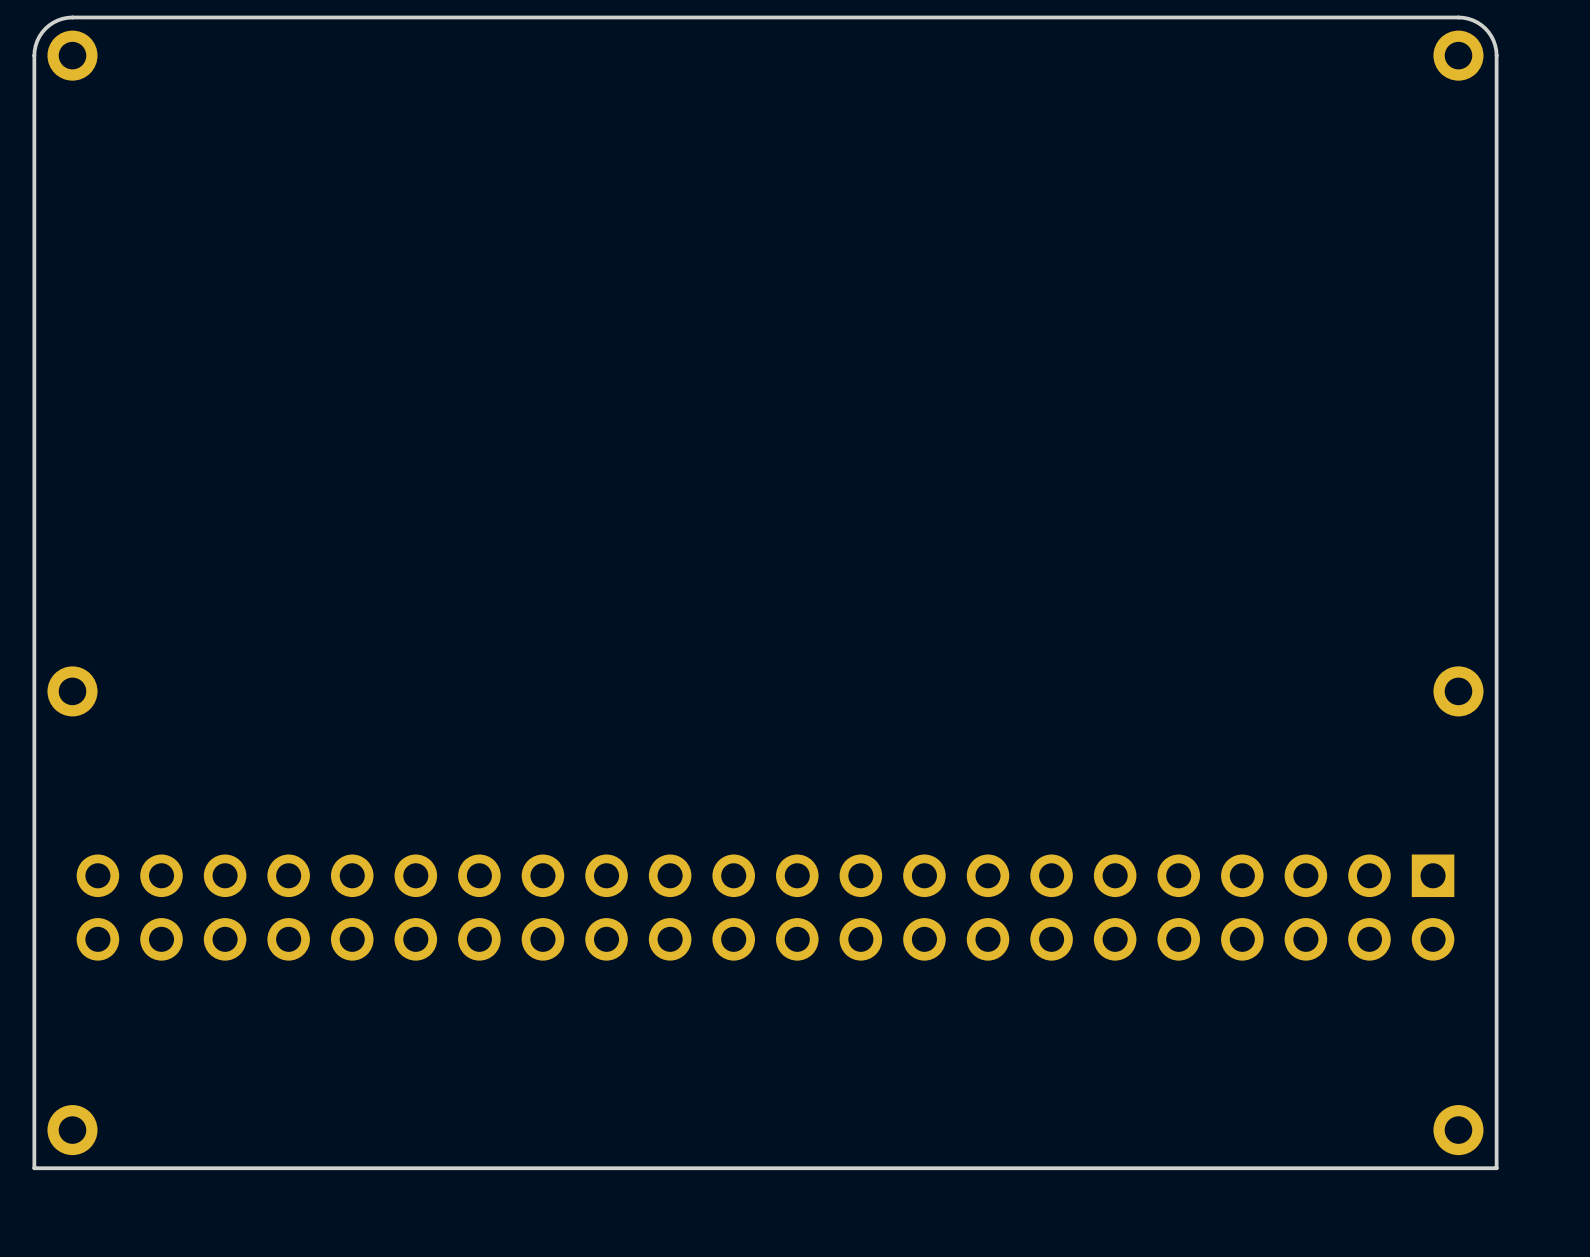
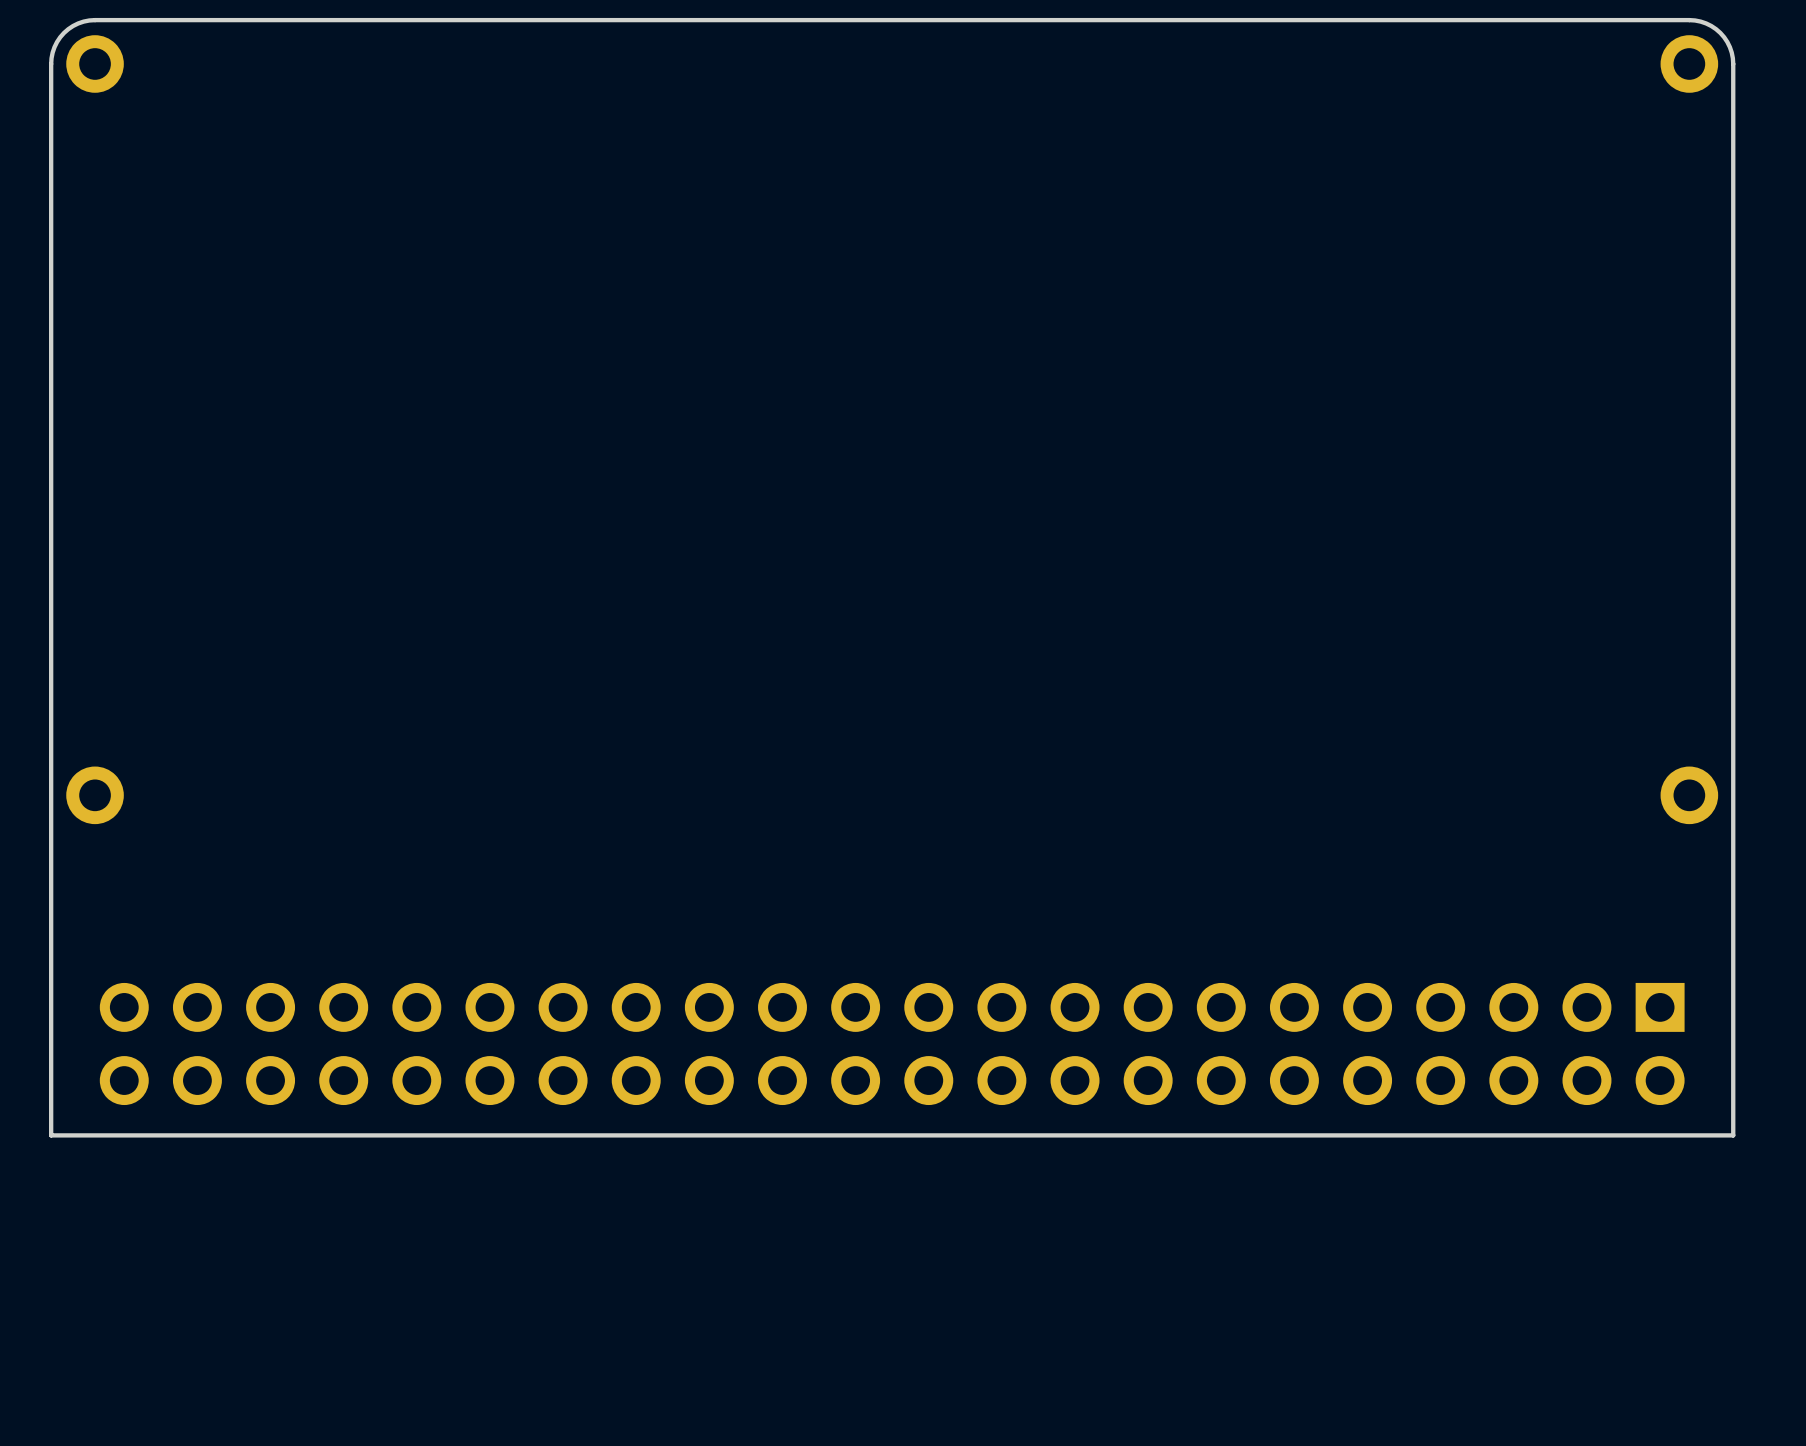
board edge: (1496, 987) (1496, 1168) (34, 1168) (34, 987) -> (1733, 1135) (51, 1135)
part: (72, 1130) -> none
part: (1458, 1130) -> none

